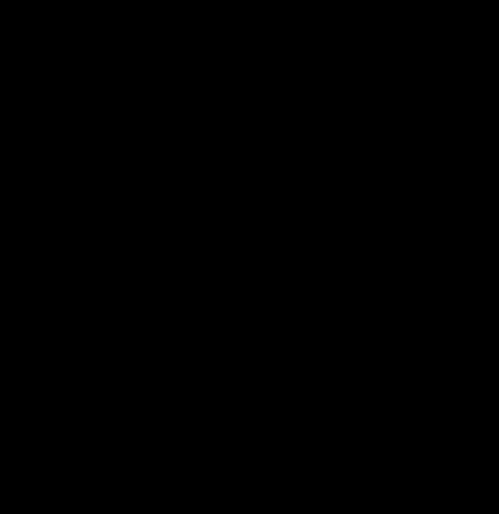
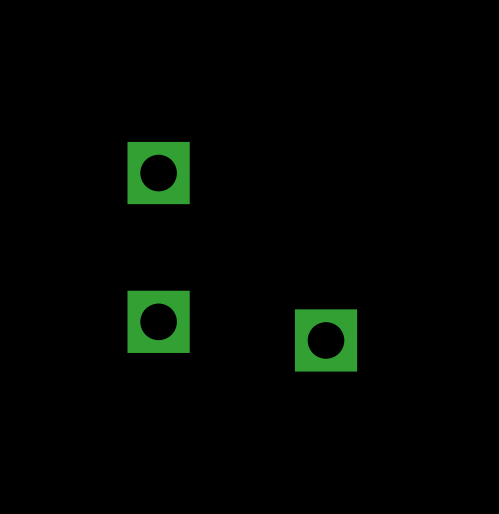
part: none -> (158, 173)
part: none -> (158, 321)
part: none -> (326, 340)

